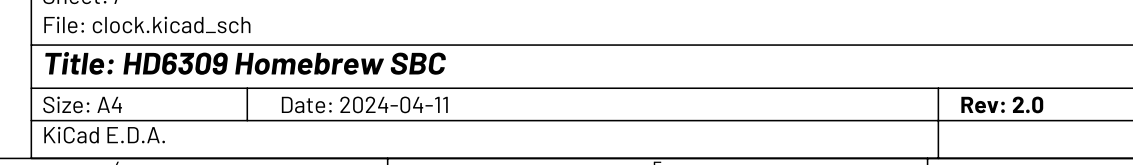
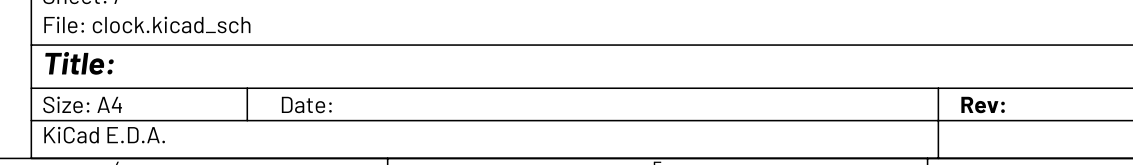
title block: Title: HD6309 Homebrew SBC (245, 63) -> Title: (79, 63)
title block: Date: 2024-04-11 (364, 104) -> Date: (306, 105)
title block: Rev: 2.0 (1002, 104) -> Rev: (983, 105)

